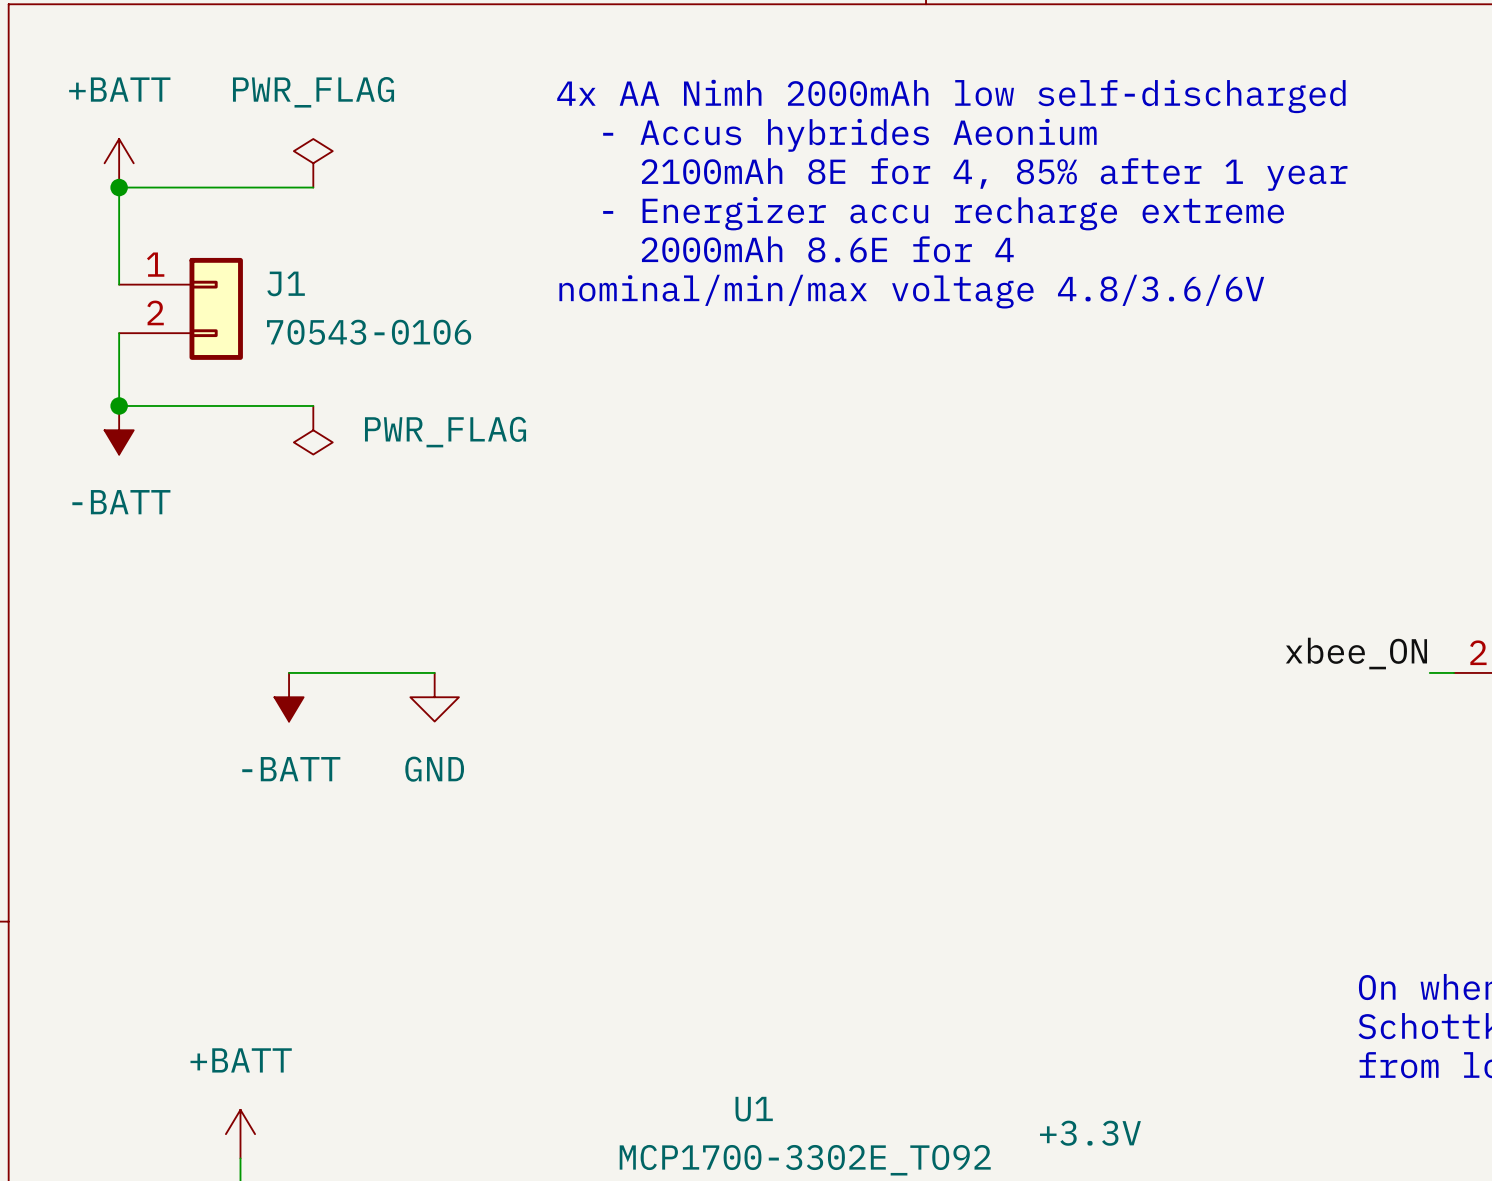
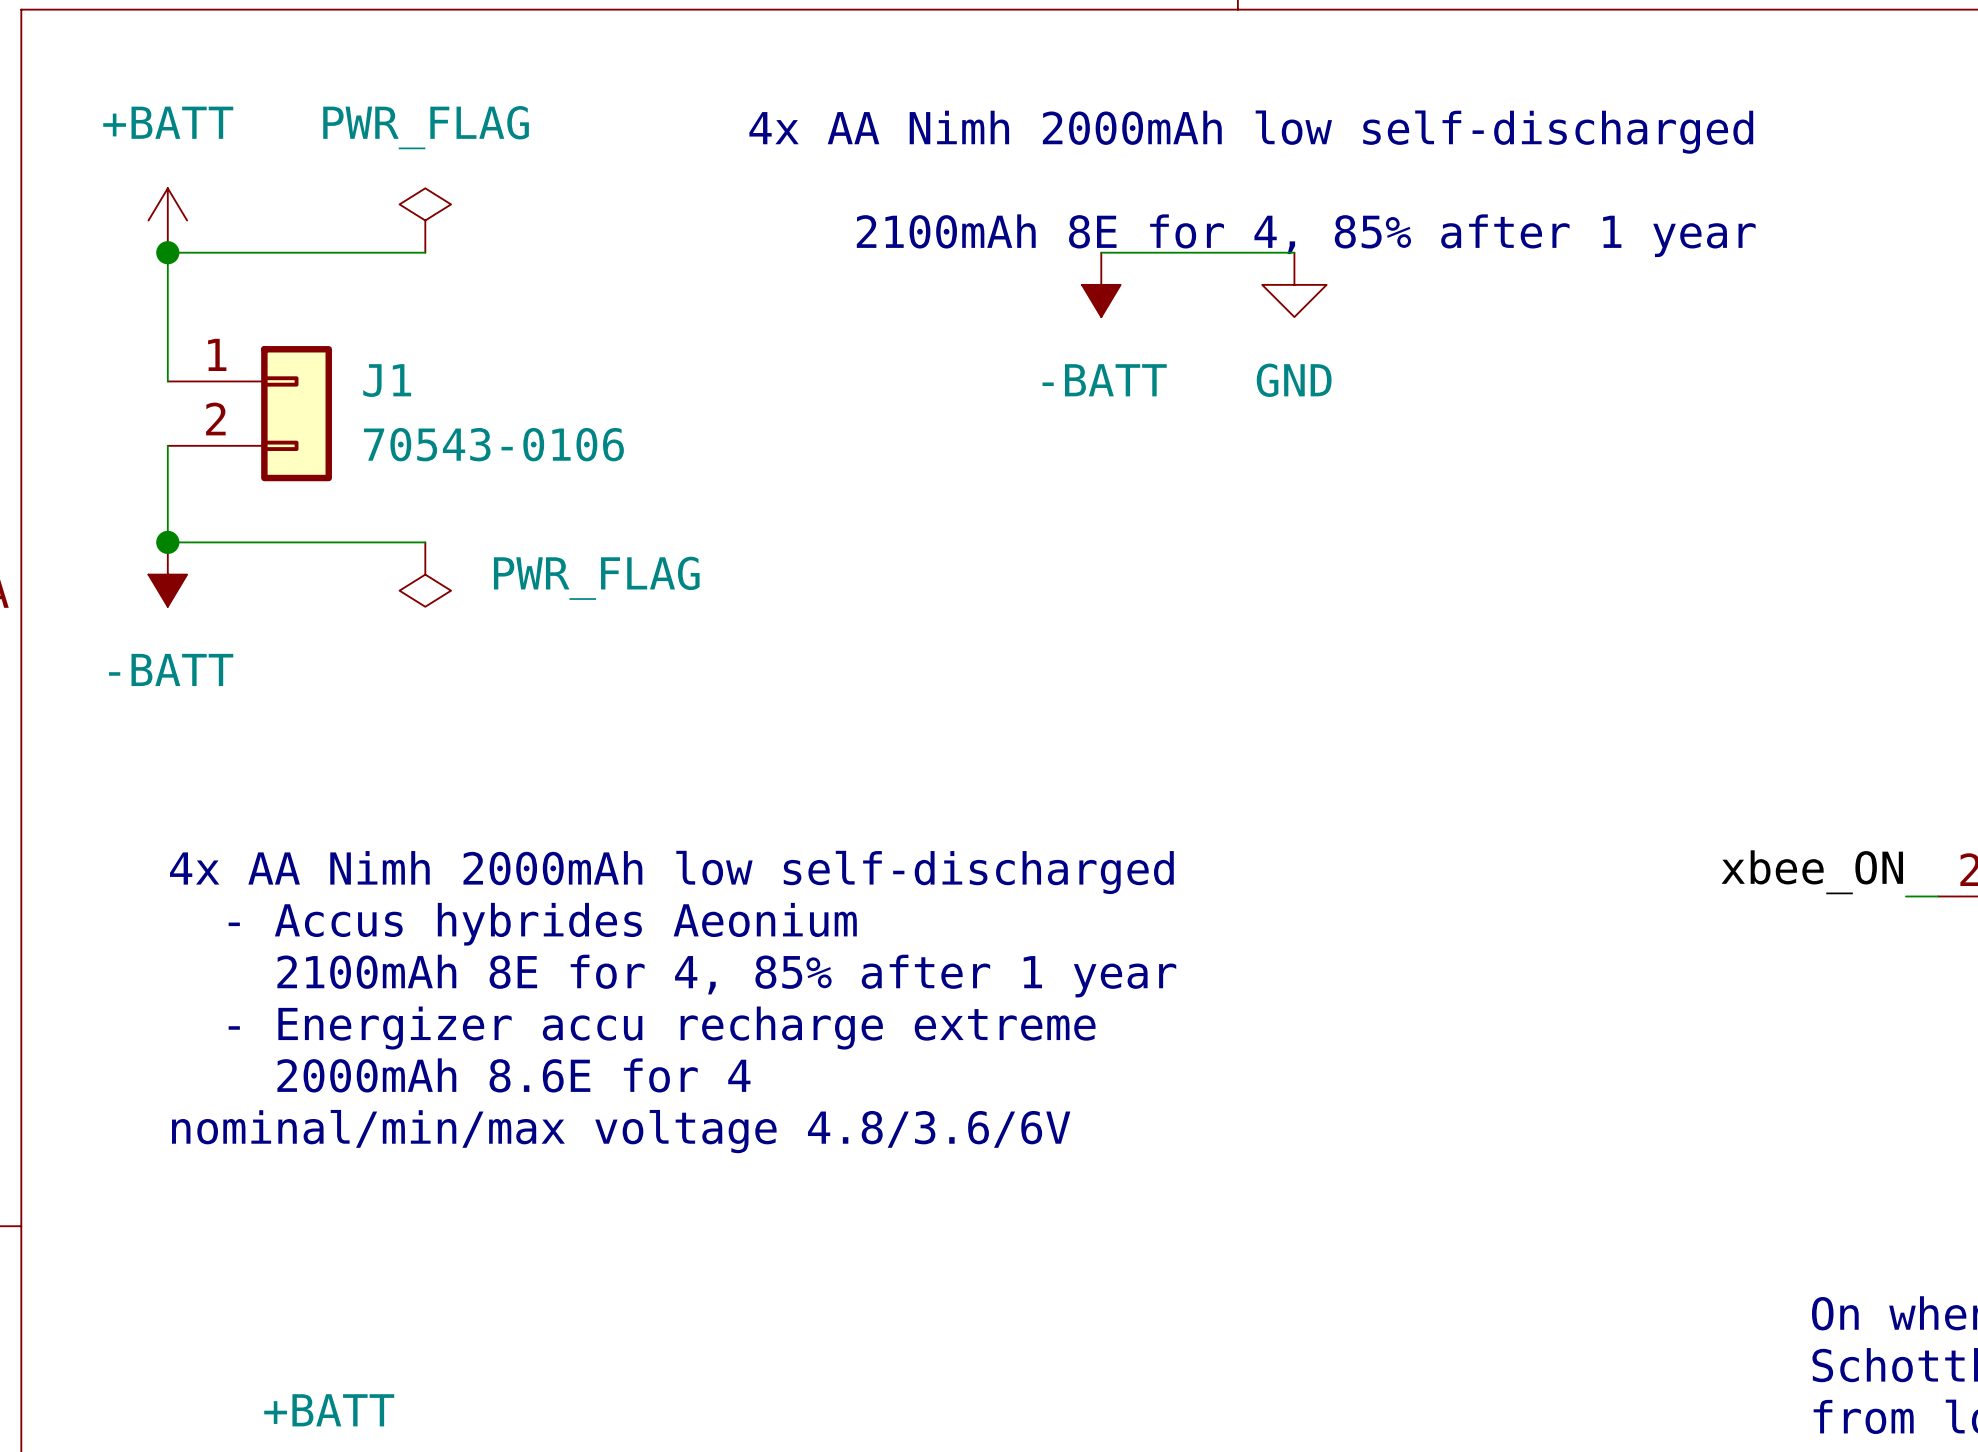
text: - Accus hybrides Aeonium (849, 135) -> none
wire: none -> (1101, 252) (1294, 252)
power symbol: none -> -BATT (1101, 284)
power symbol: none -> GND (1294, 284)
text: - Energizer accu recharge extreme (943, 213) -> none
text: 2000mAh 8.6E for 4 (827, 249) -> none
text: nominal/min/max voltage 4.8/3.6/6V (911, 291) -> none
text: none -> 4x AA Nimh 2000mAh low self-discharged (671, 872)
wire: (289, 672) (434, 672) -> none
text: none -> - Accus hybrides Aeonium (542, 924)
power symbol: -BATT (289, 697) -> none
power symbol: GND (434, 697) -> none
text: none -> 2100mAh 8E for 4, 85% after 1 year (726, 976)
text: none -> - Energizer accu recharge extreme (662, 1028)
text: none -> 2000mAh 8.6E for 4 (513, 1075)
text: none -> nominal/min/max voltage 4.8/3.6/6V (621, 1131)

